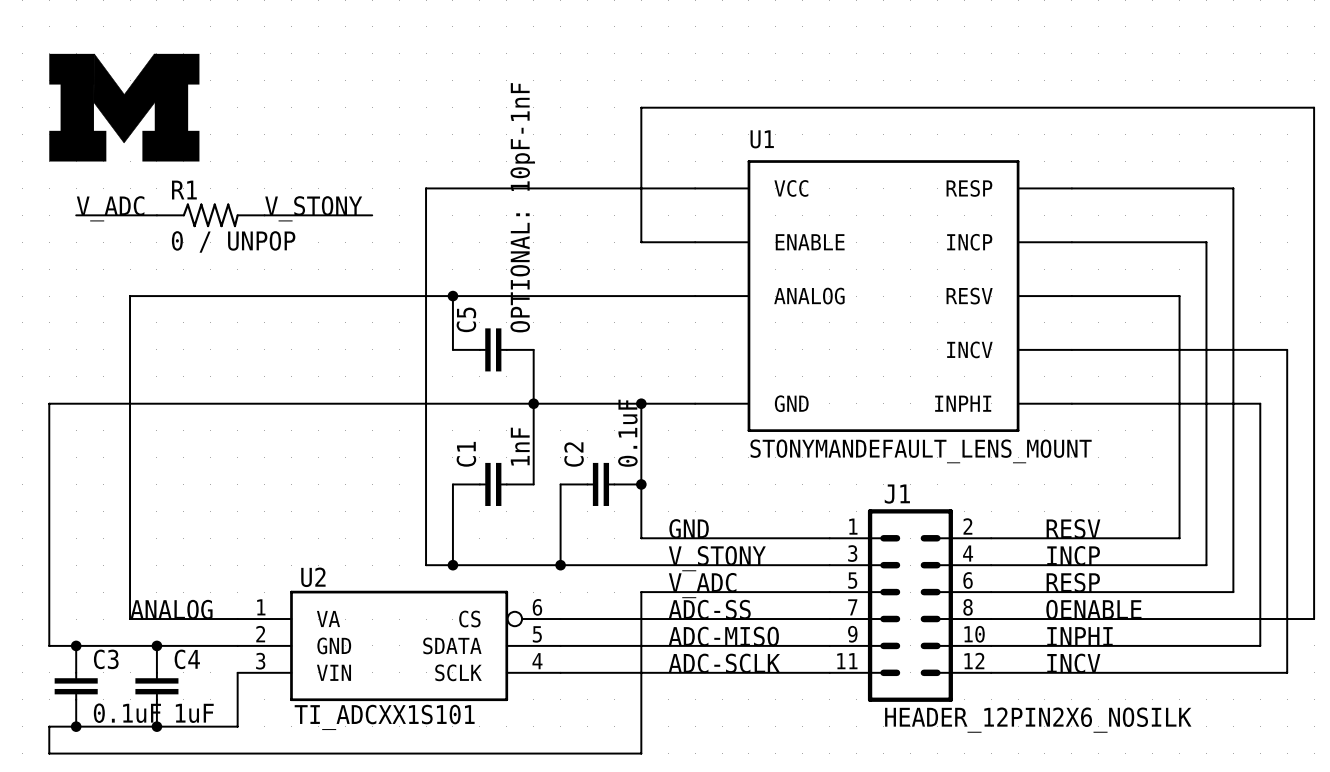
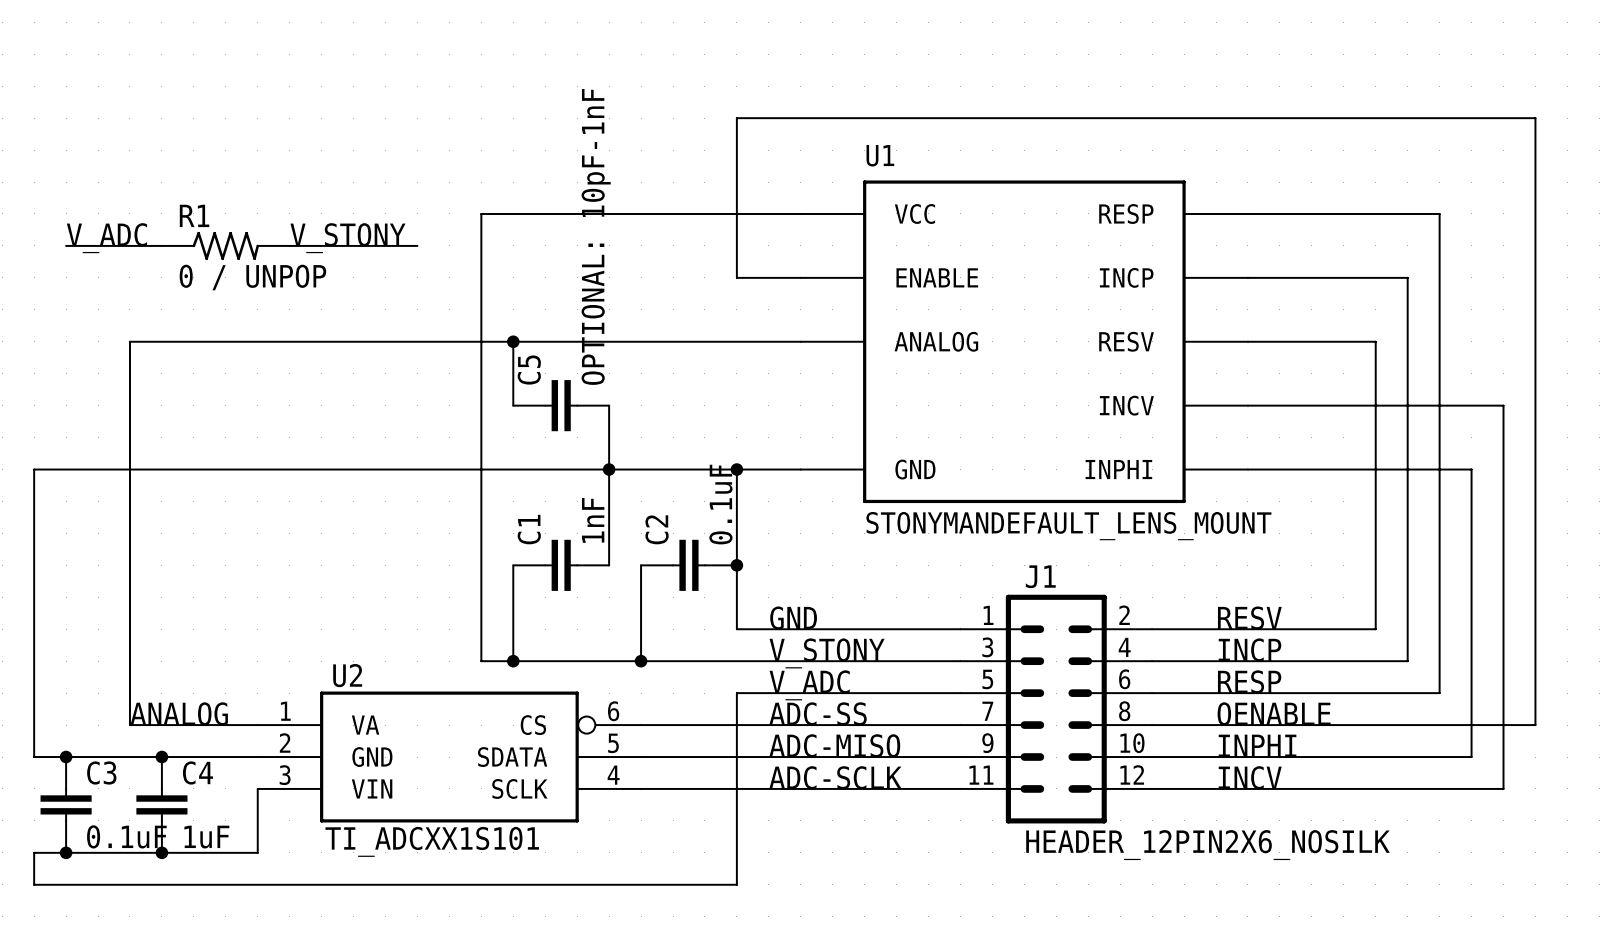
part: (124, 107) -> none

